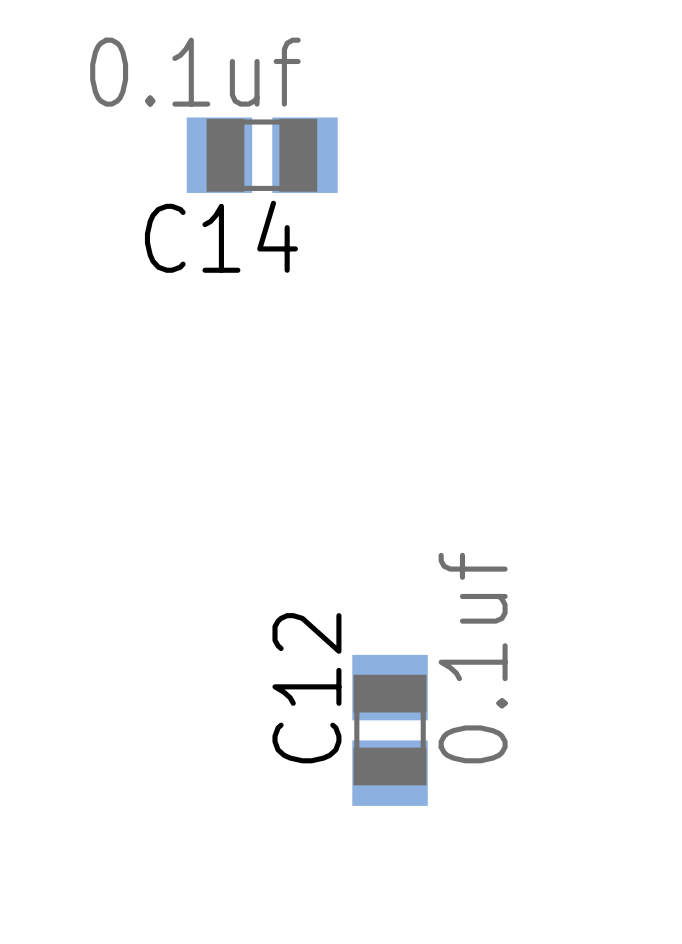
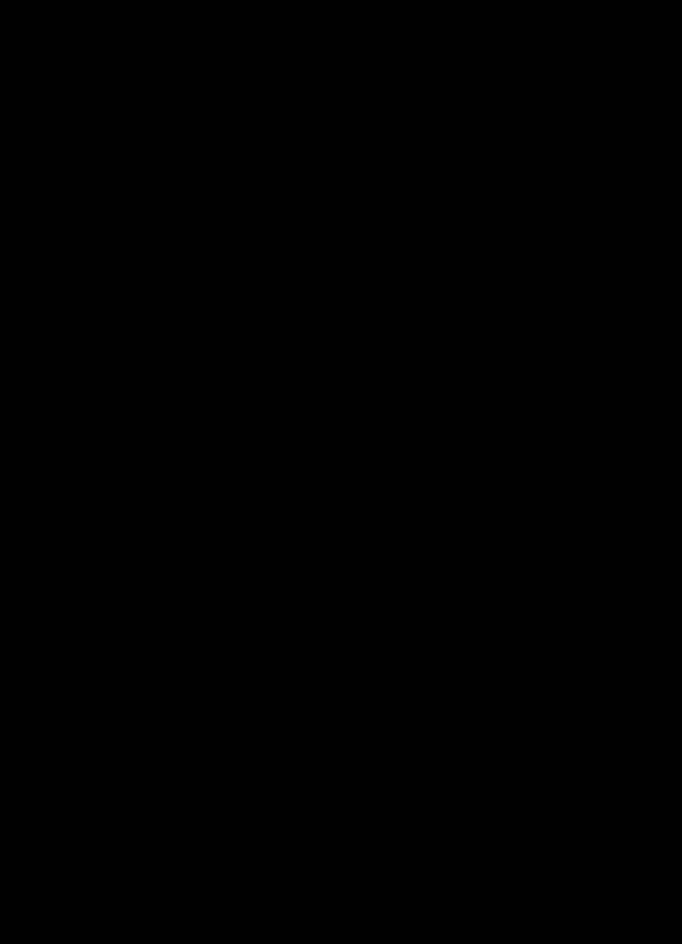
C14: 0.1uf (262, 155) -> none
C12: 0.1uf (390, 730) -> none

